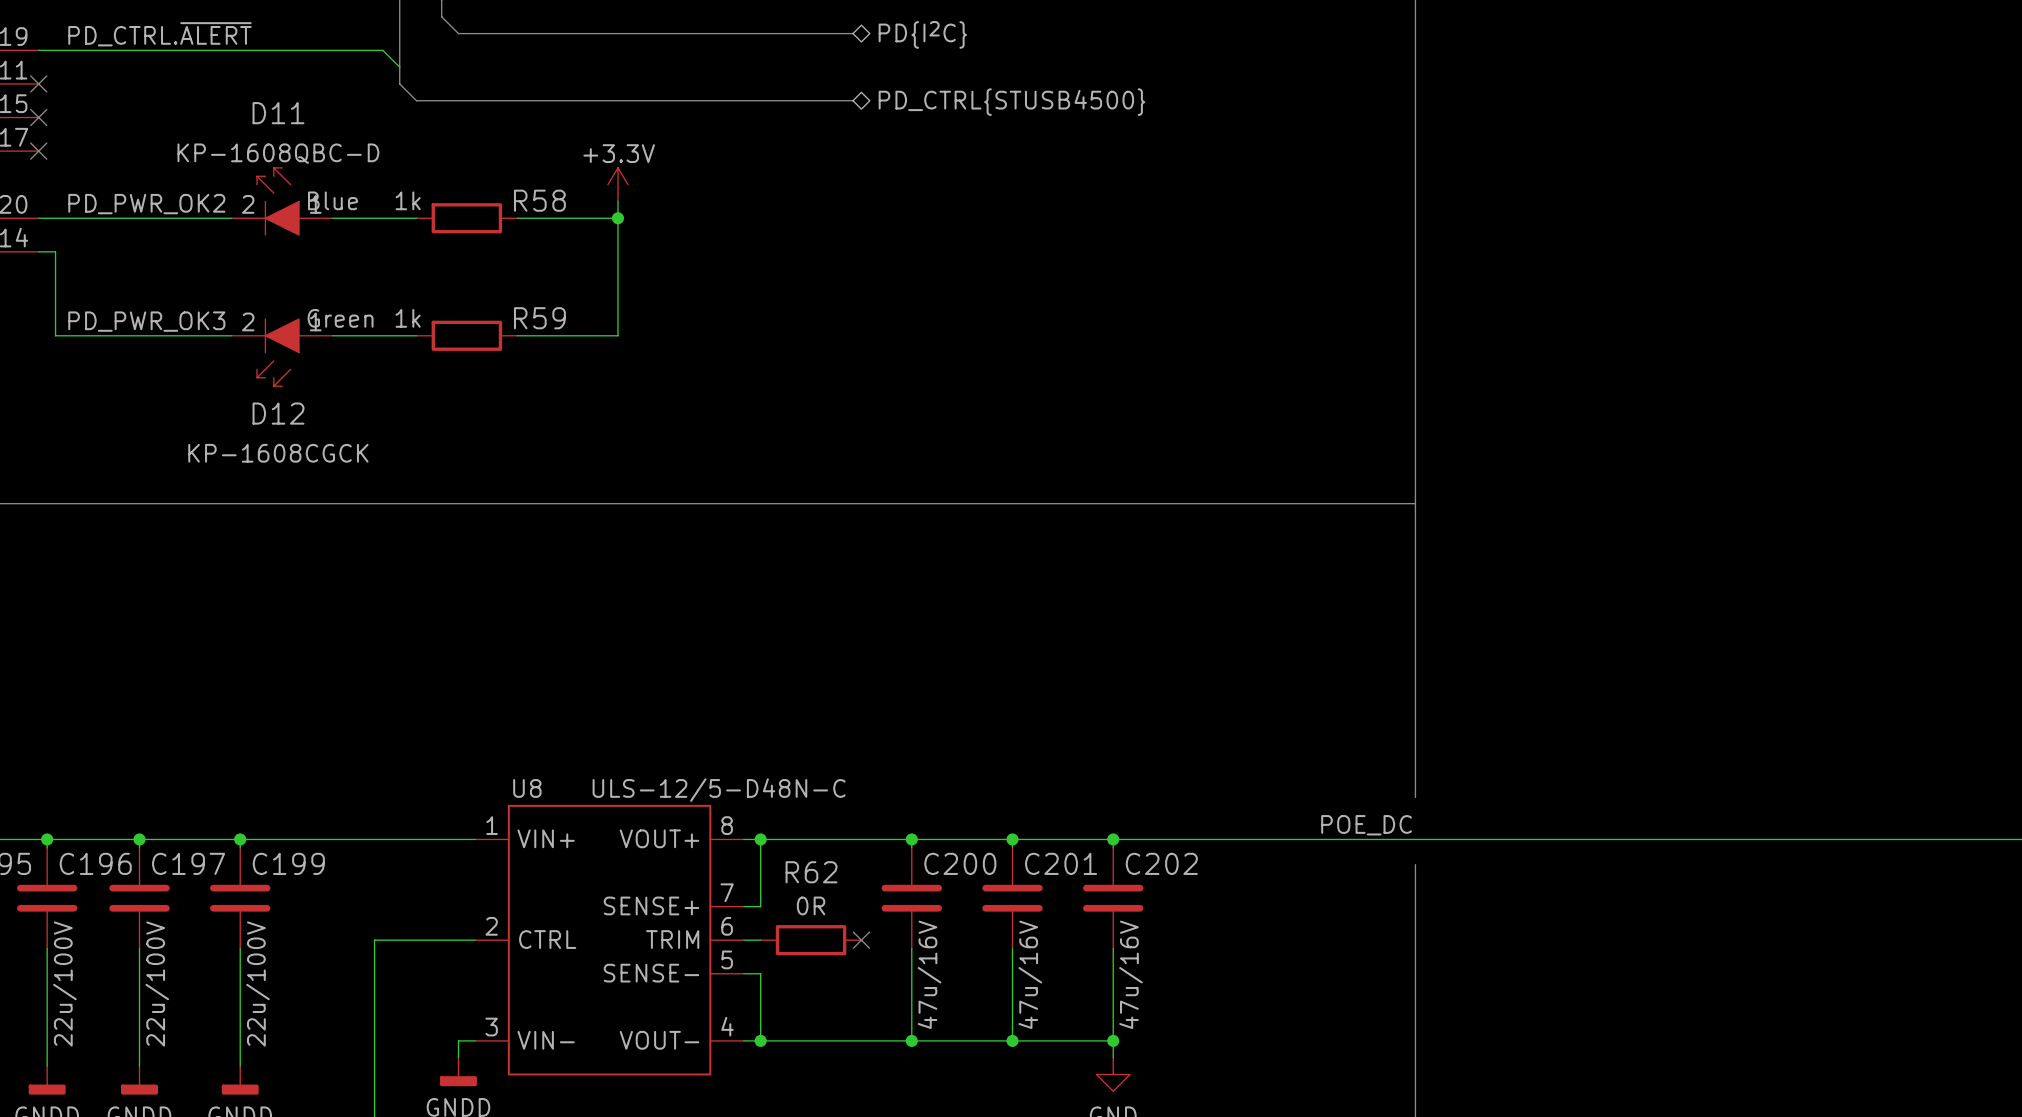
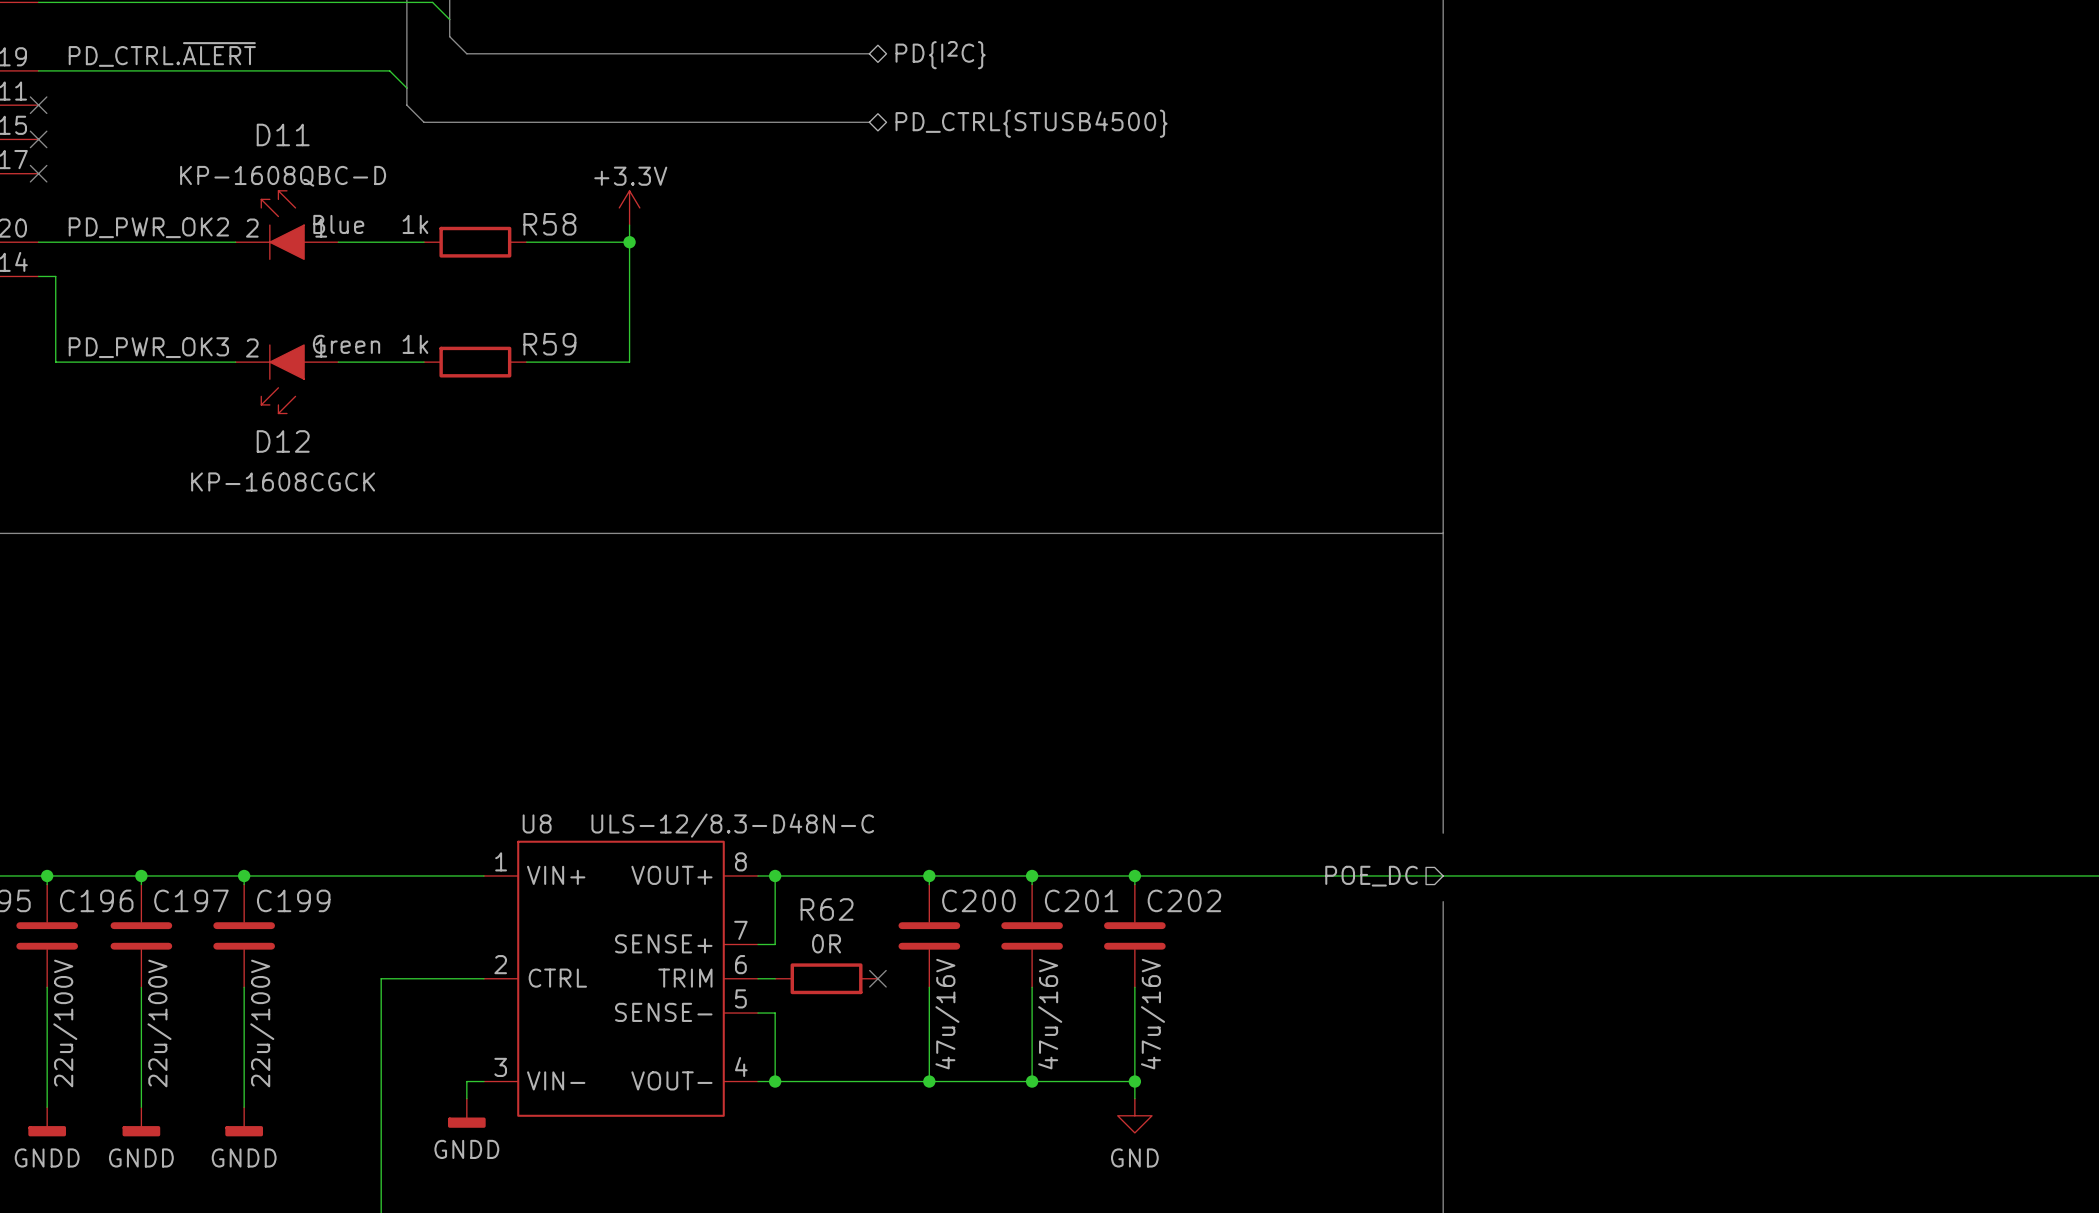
U8 value: ULS-12/5-D48N-C (719, 790) -> ULS-12/8.3-D48N-C (732, 825)
label: POE_DC (1366, 825) -> none
hierarchical label: none -> POE_DC (1371, 876)

